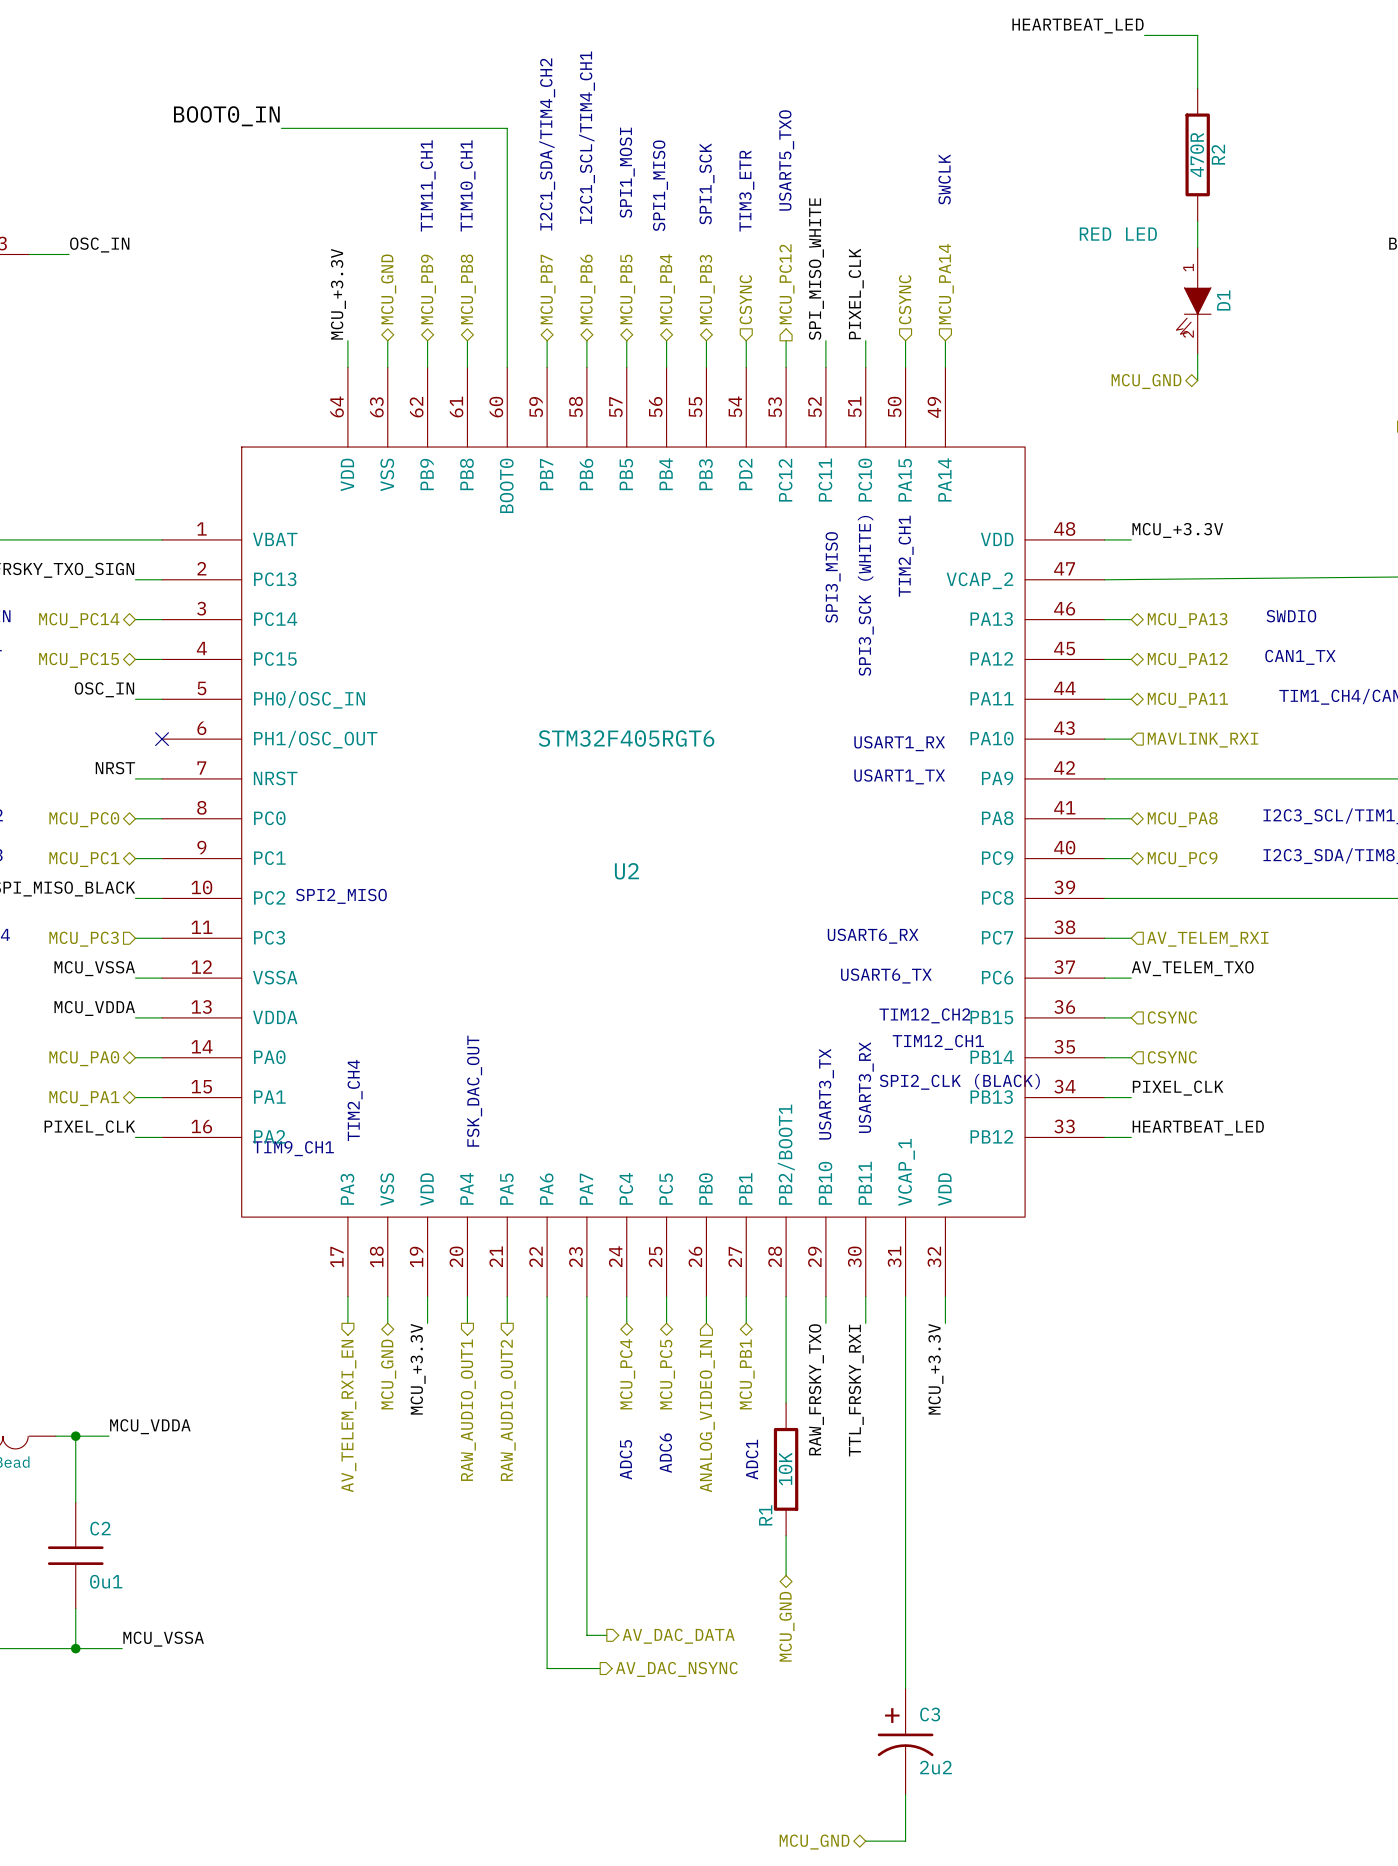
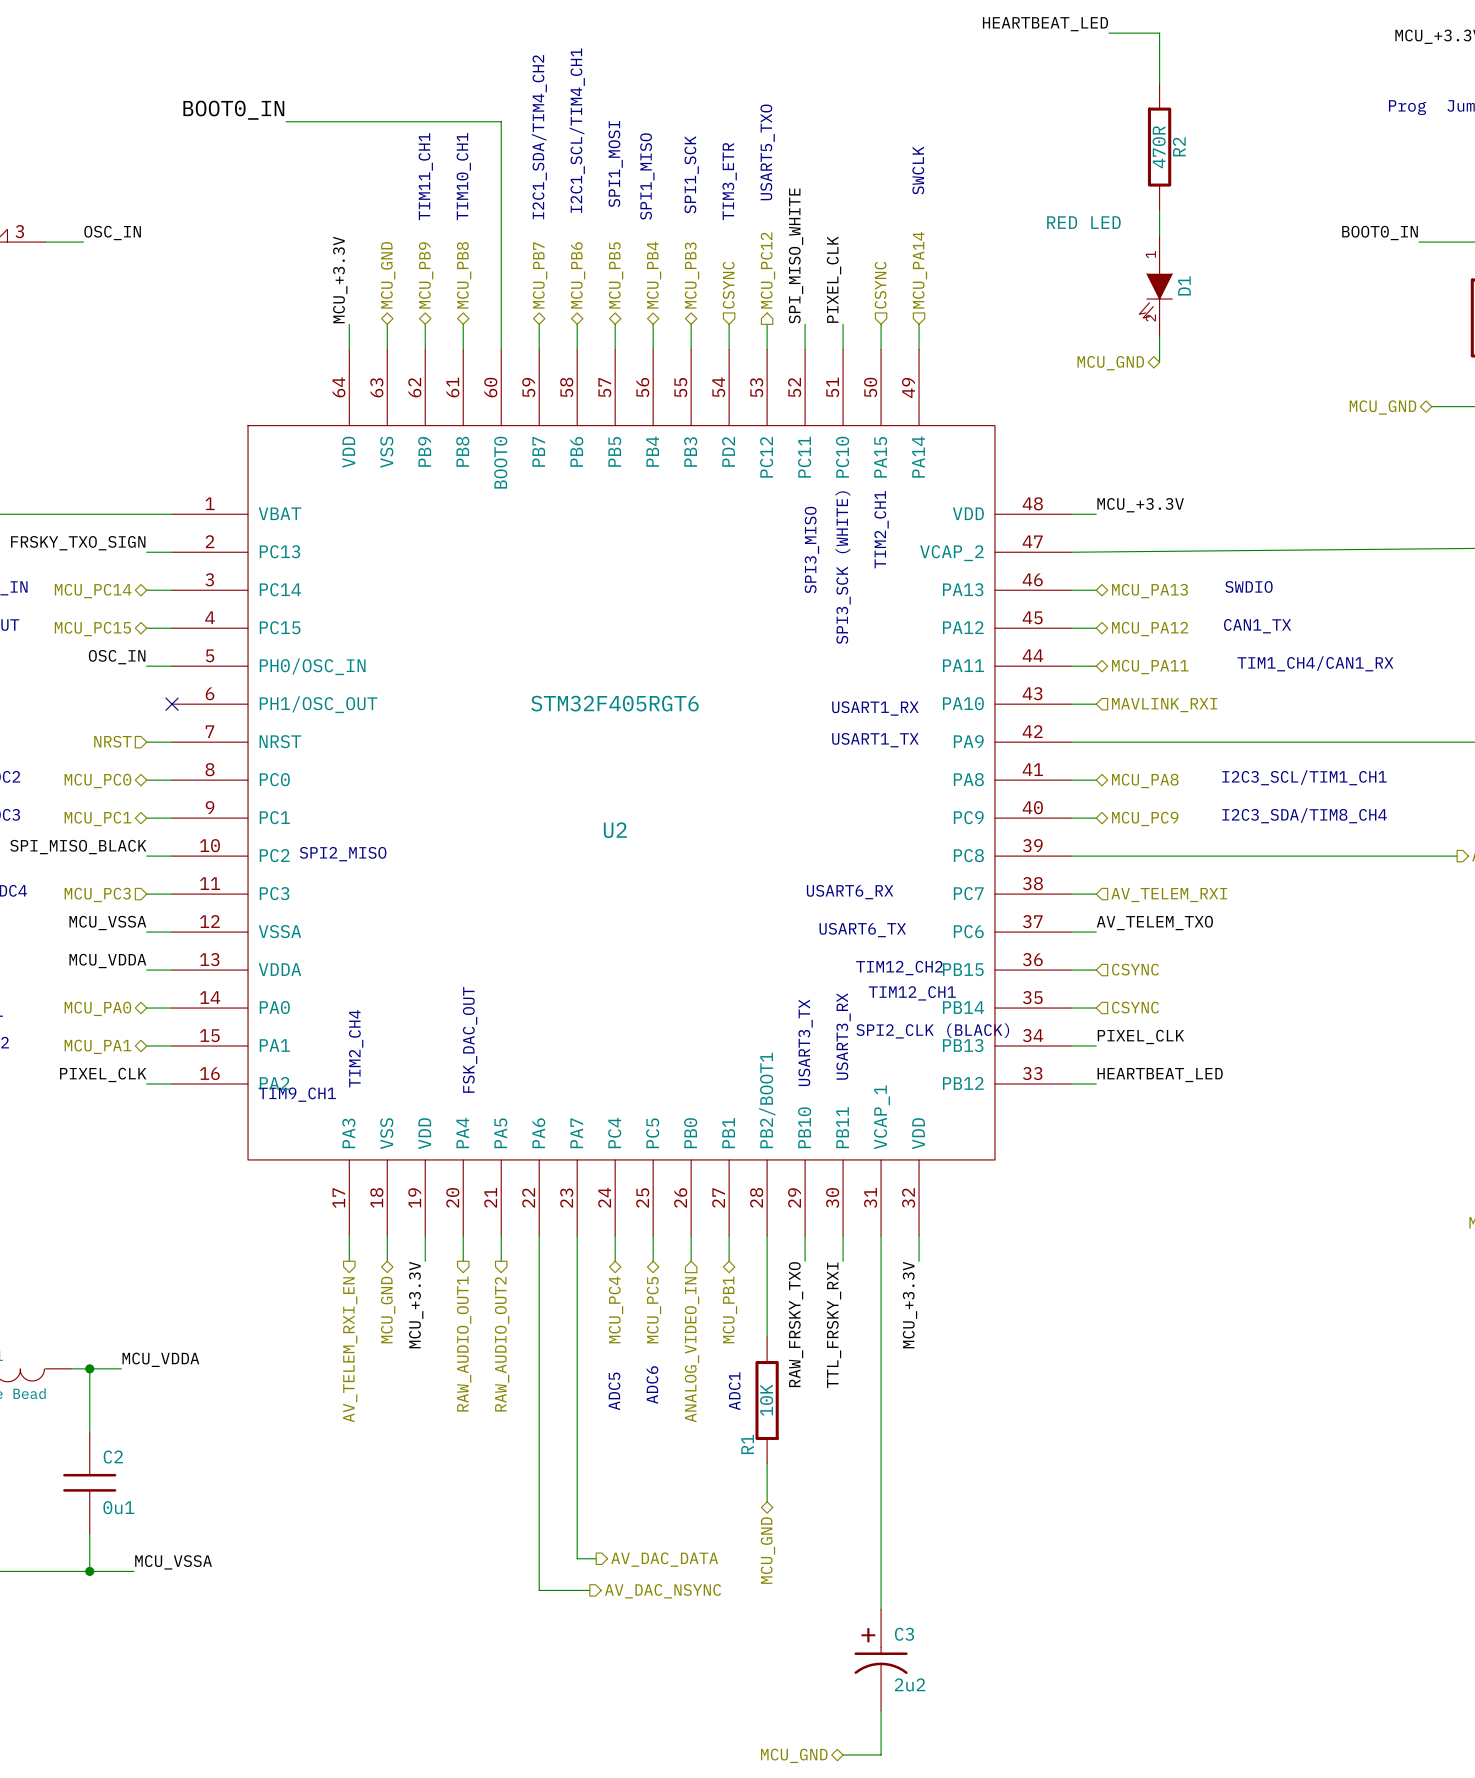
label: NRST (115, 768) -> none
hierarchical label: none -> NRST (112, 741)

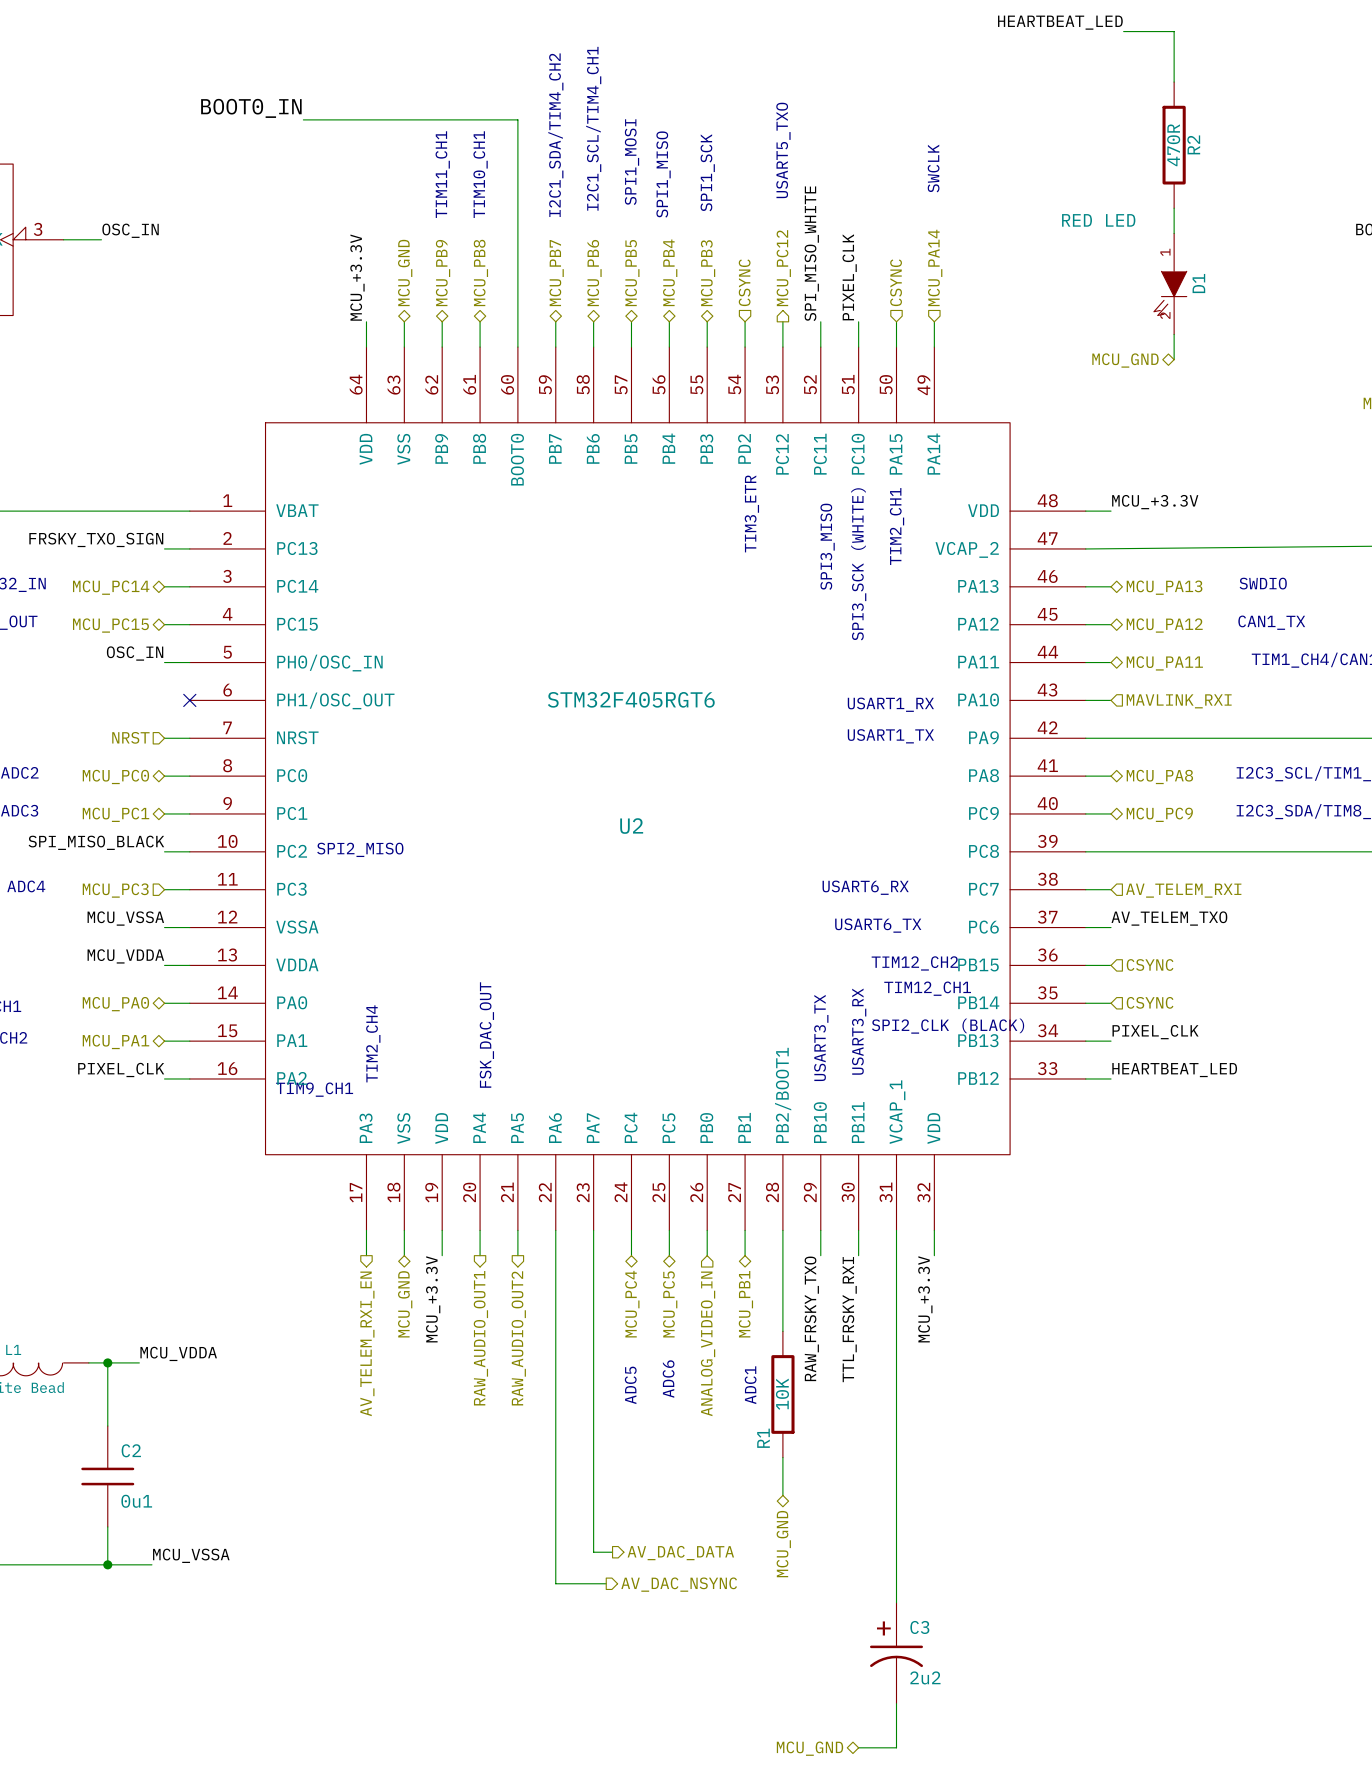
text: TIM3_ETR (729, 181) -> none
text: none -> TIM3_ETR (751, 513)

